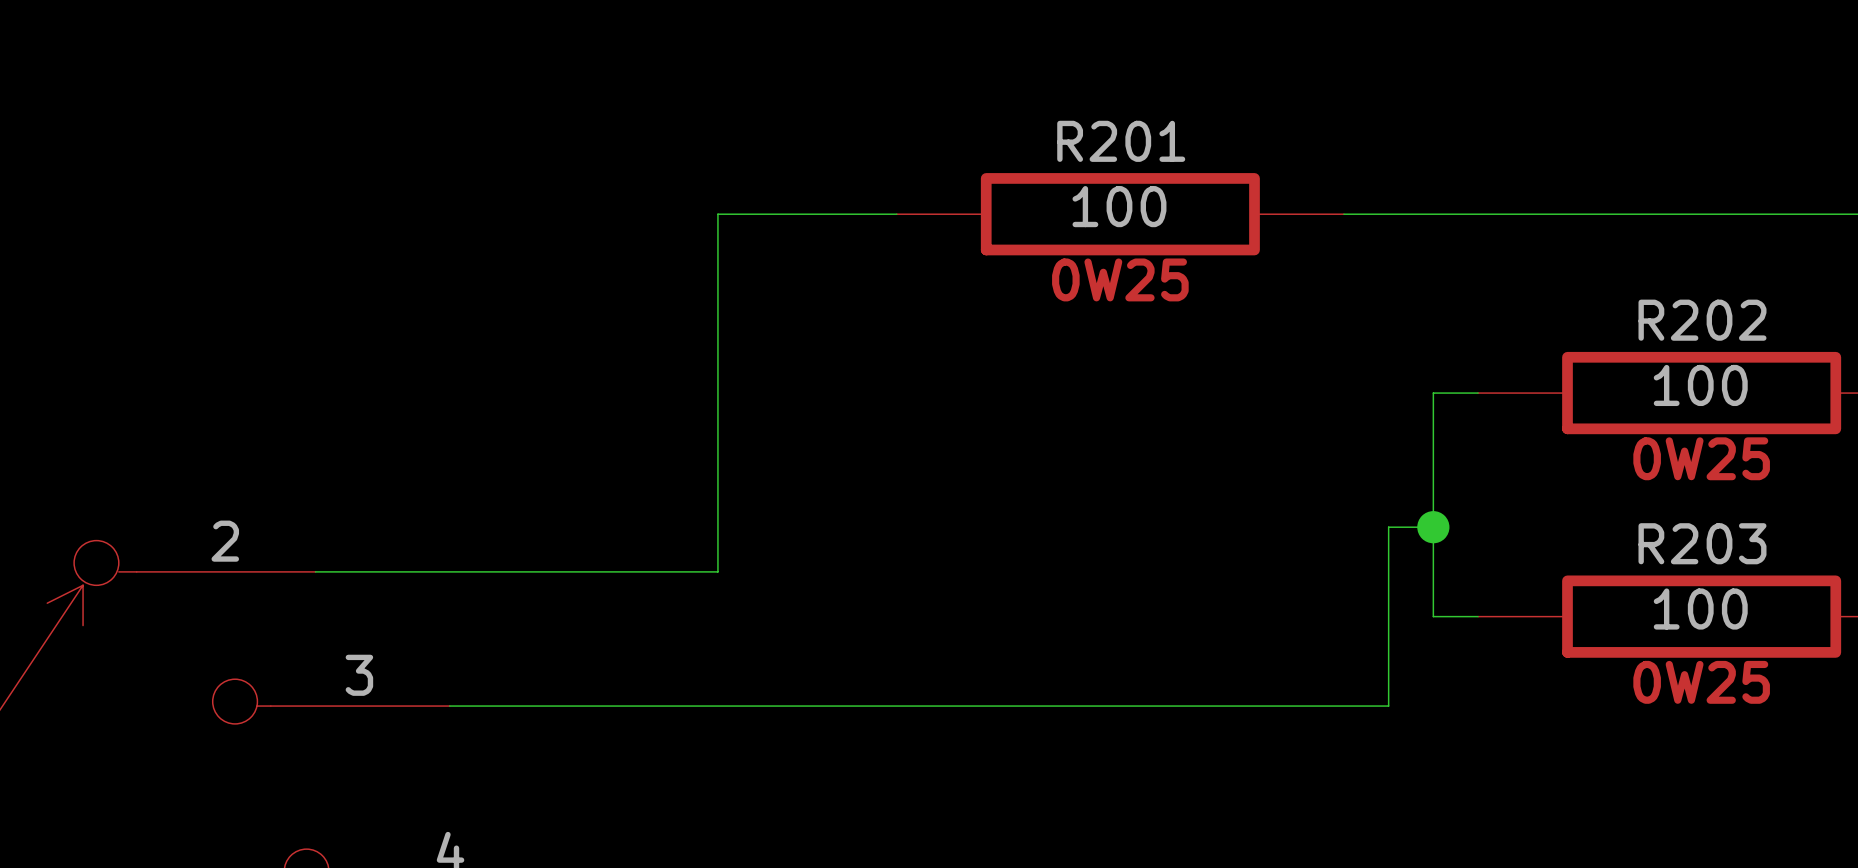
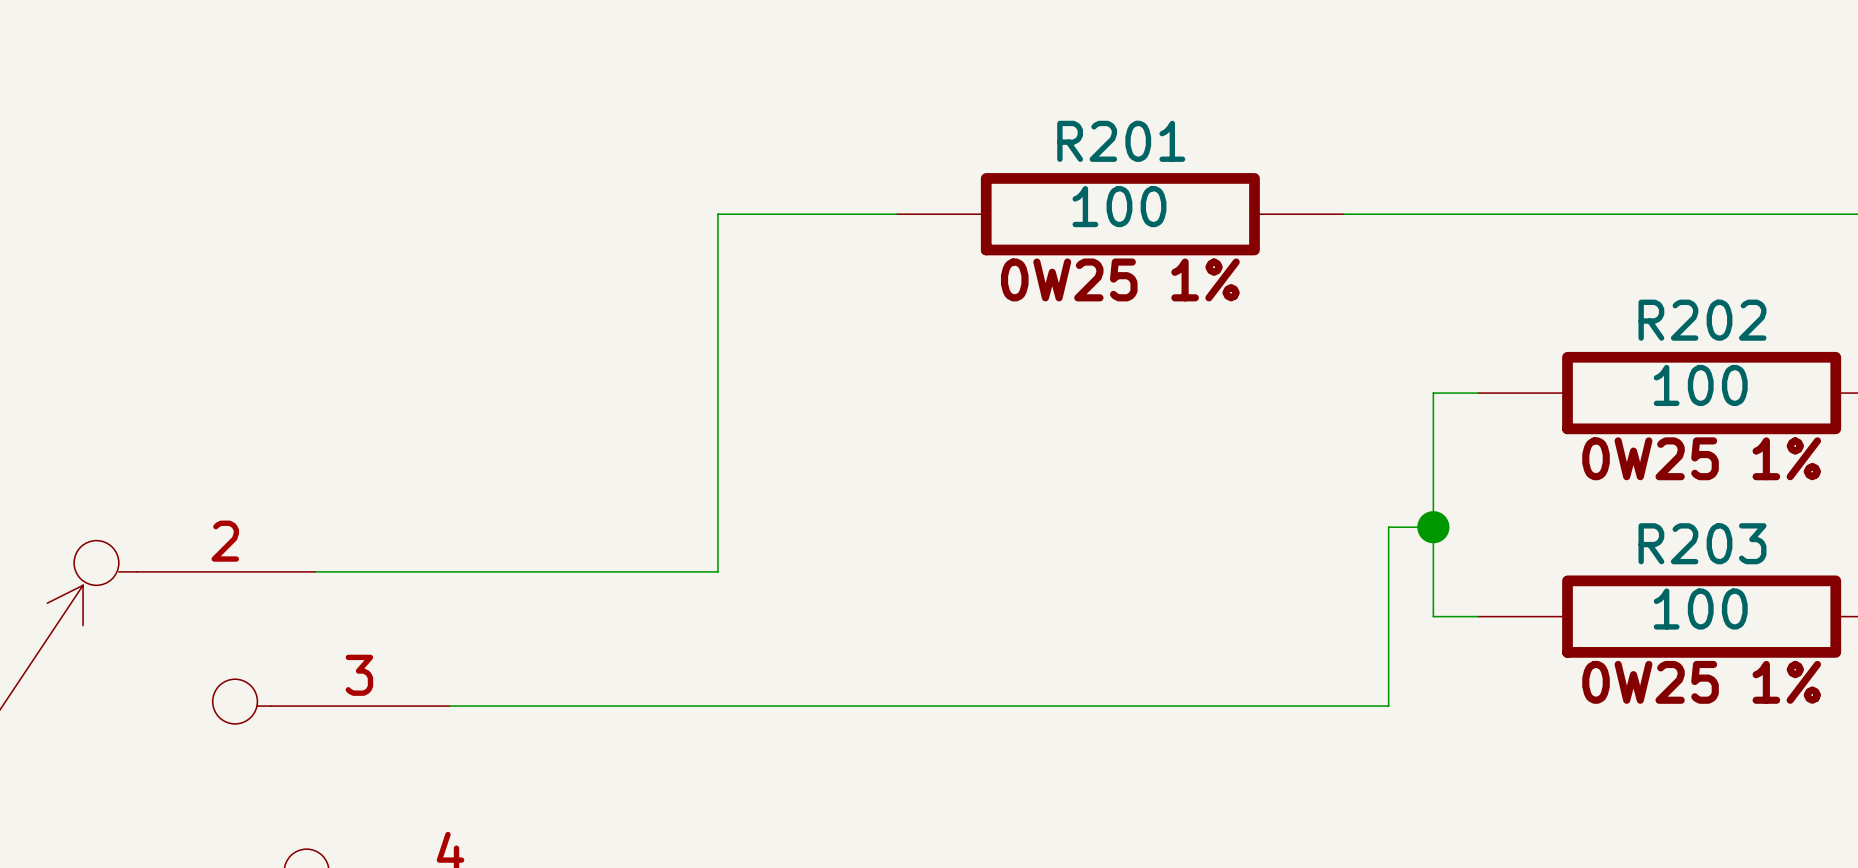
R201 text: 0W25 (1120, 279) -> 0W25 1% (1120, 279)
R202 text: 0W25 (1701, 458) -> 0W25 1% (1701, 458)
R203 text: 0W25 (1701, 682) -> 0W25 1% (1701, 682)

